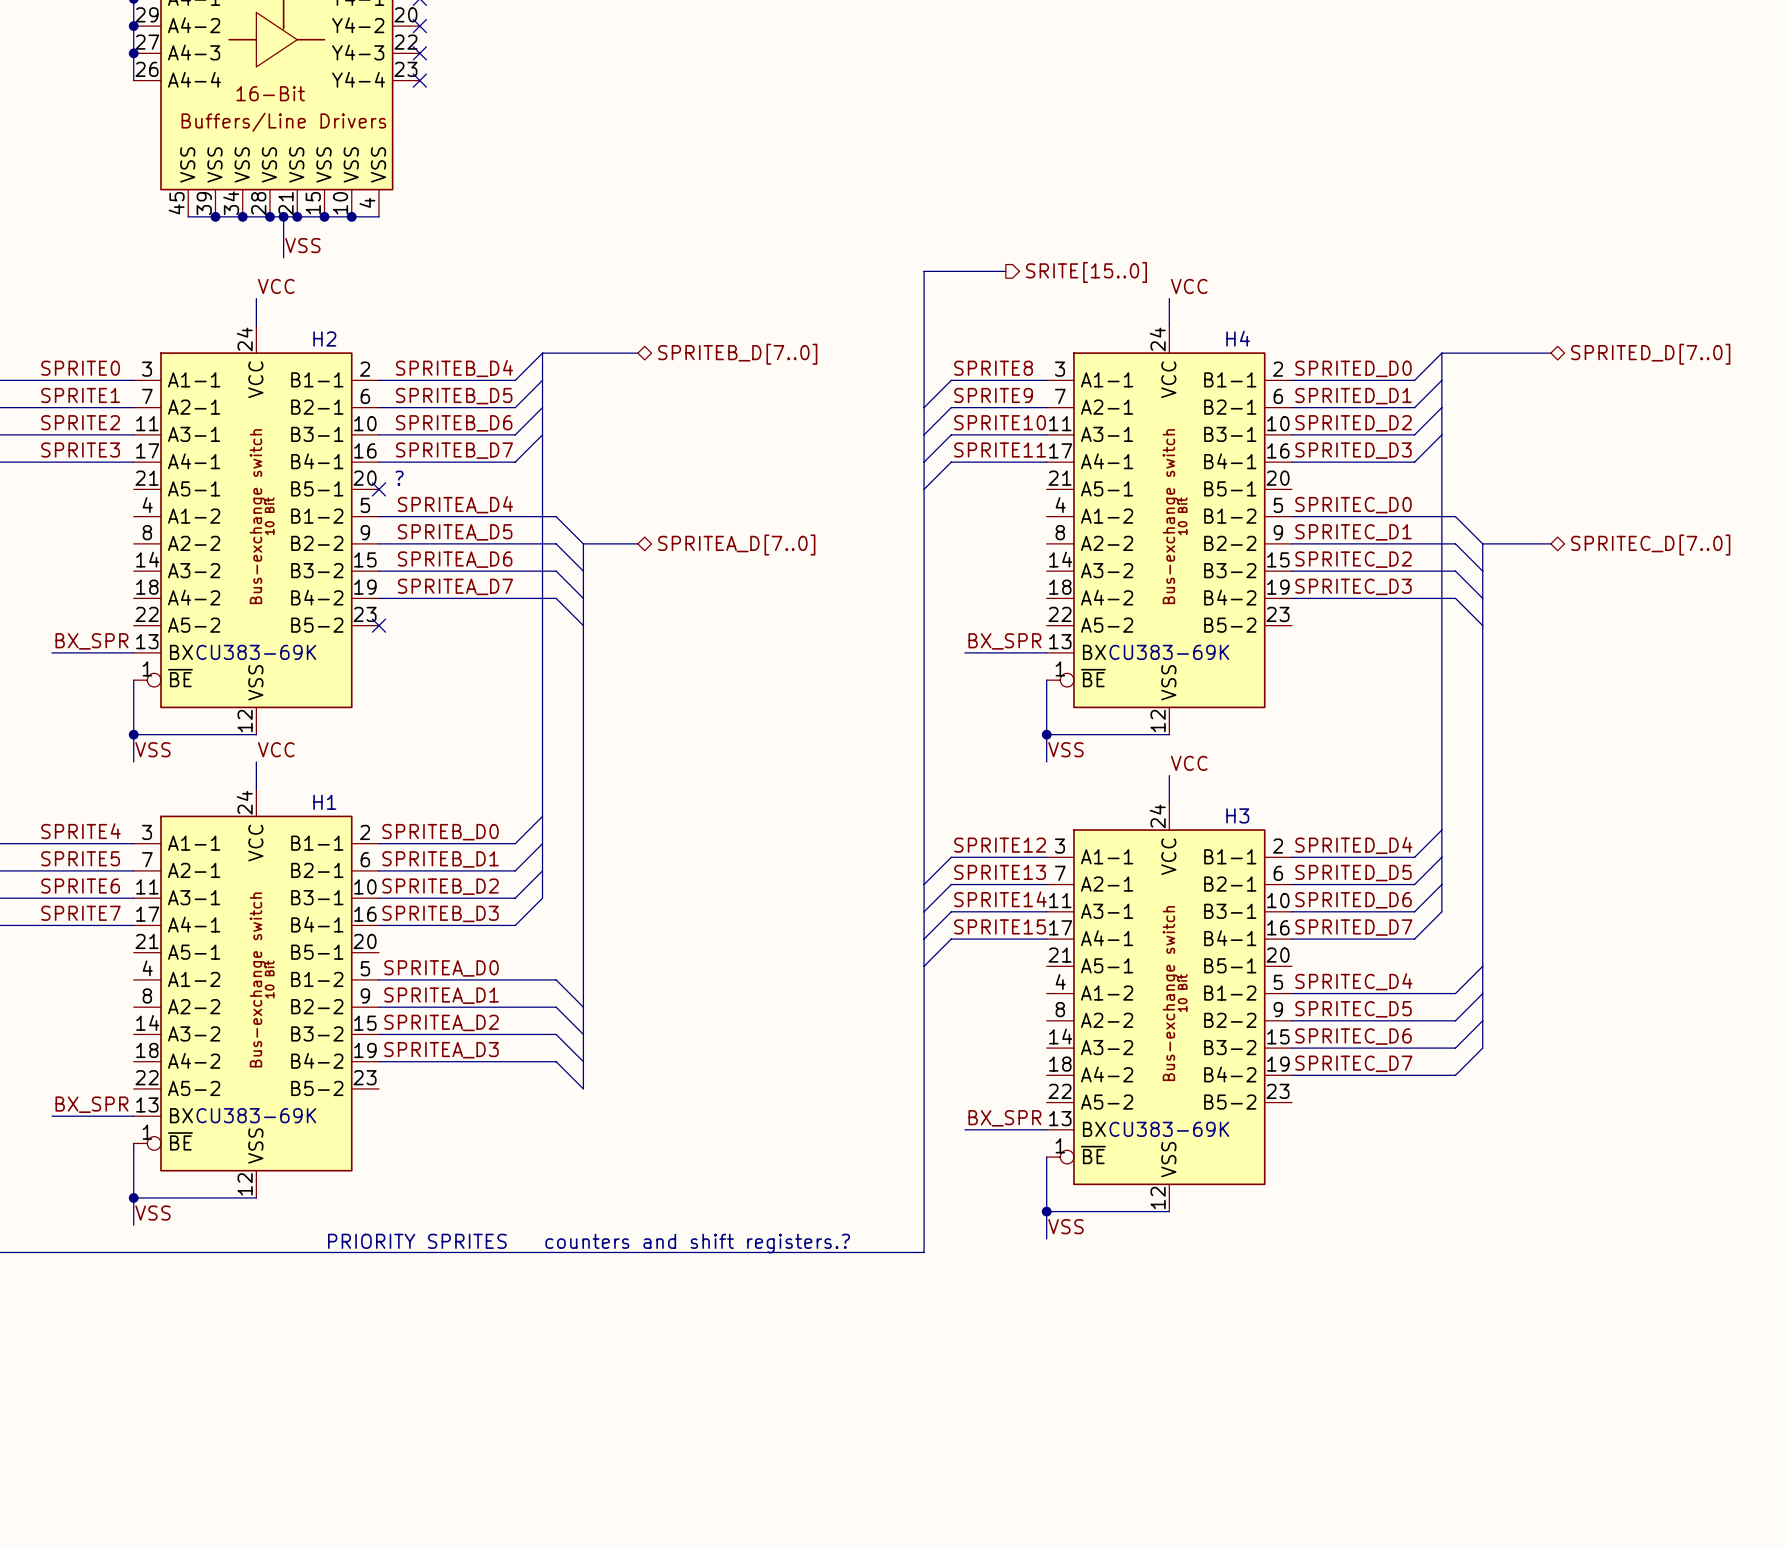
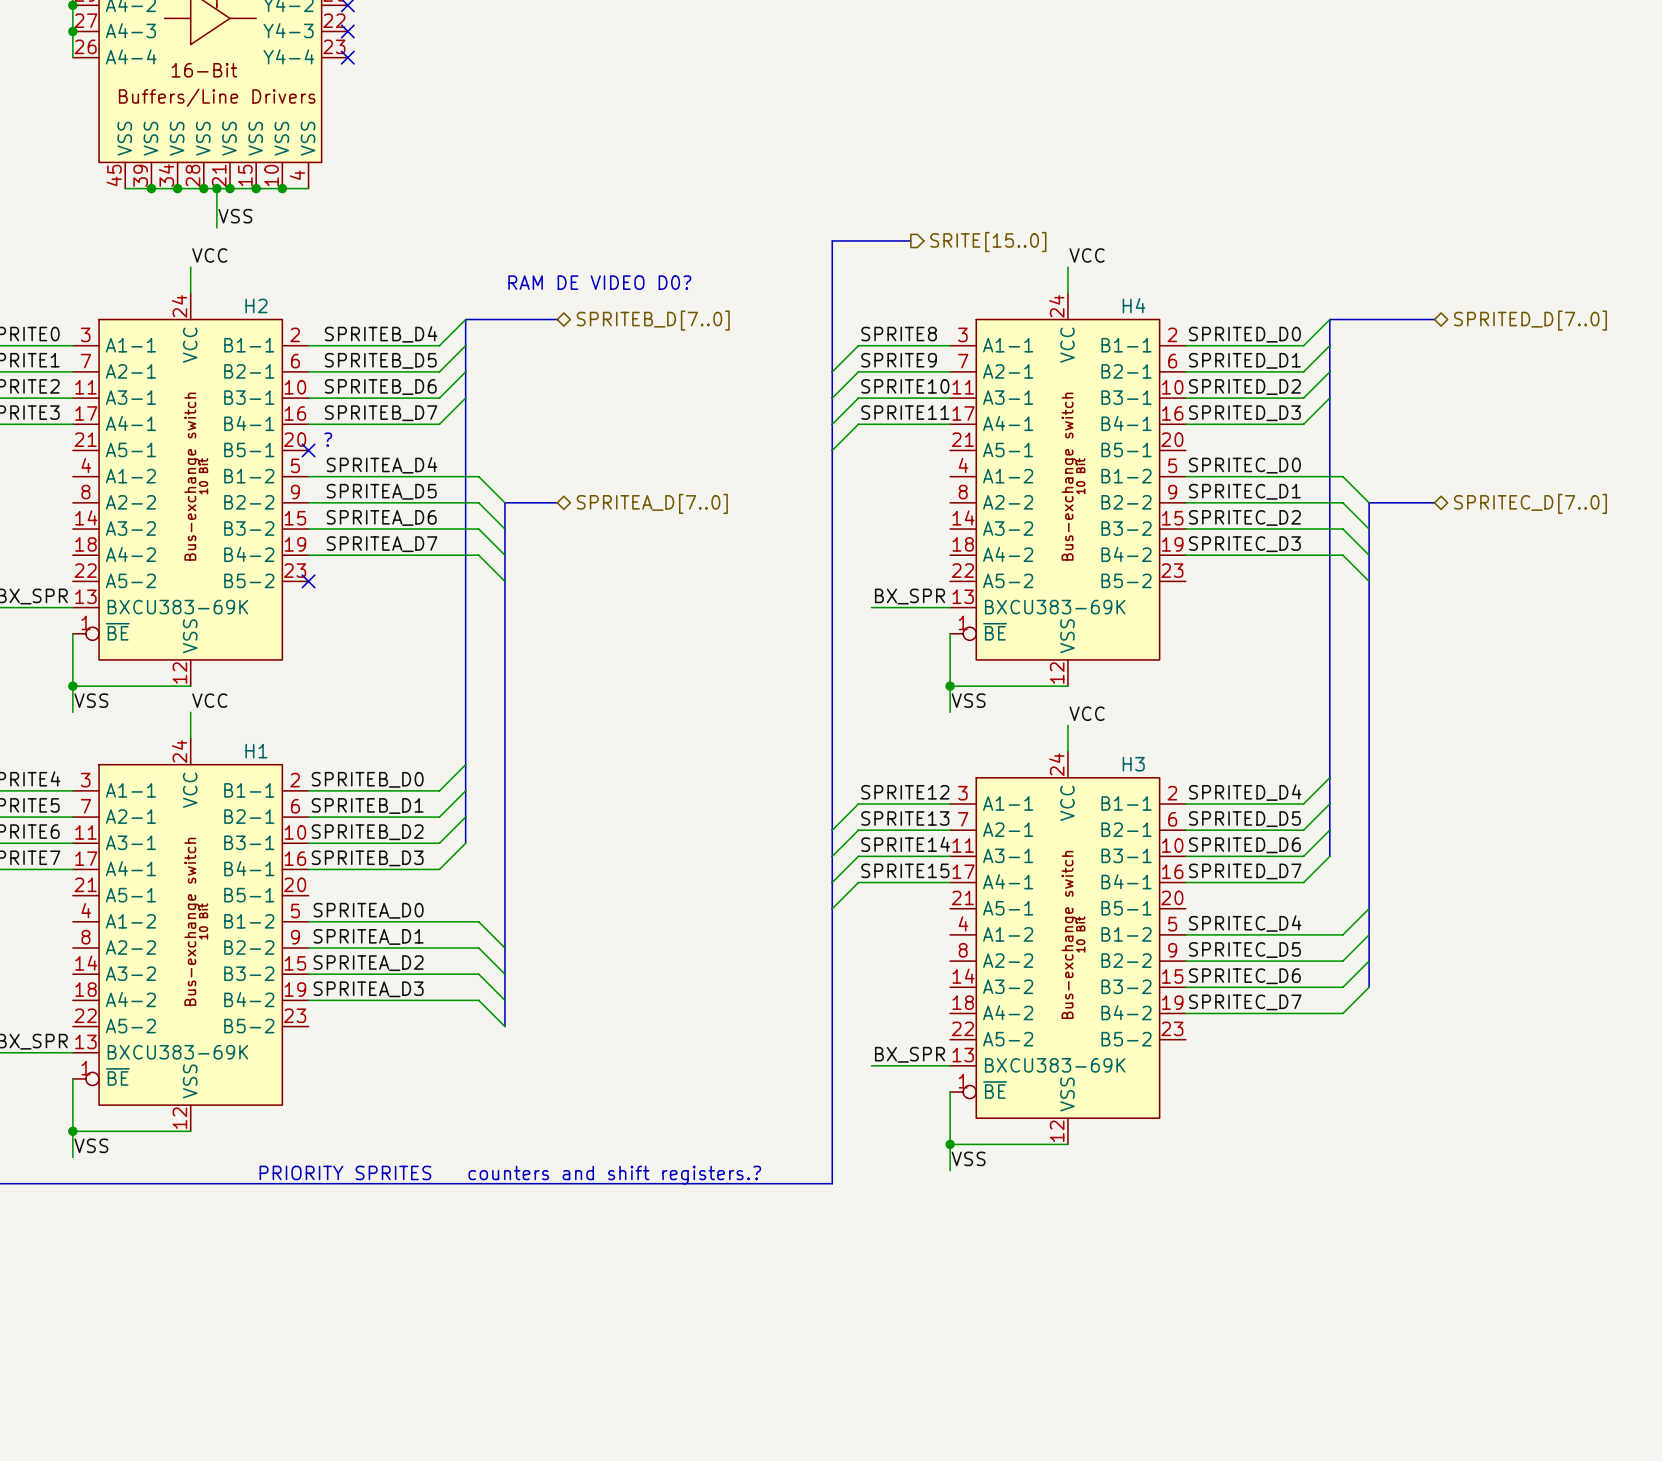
text: none -> RAM DE VIDEO D0? (599, 282)

